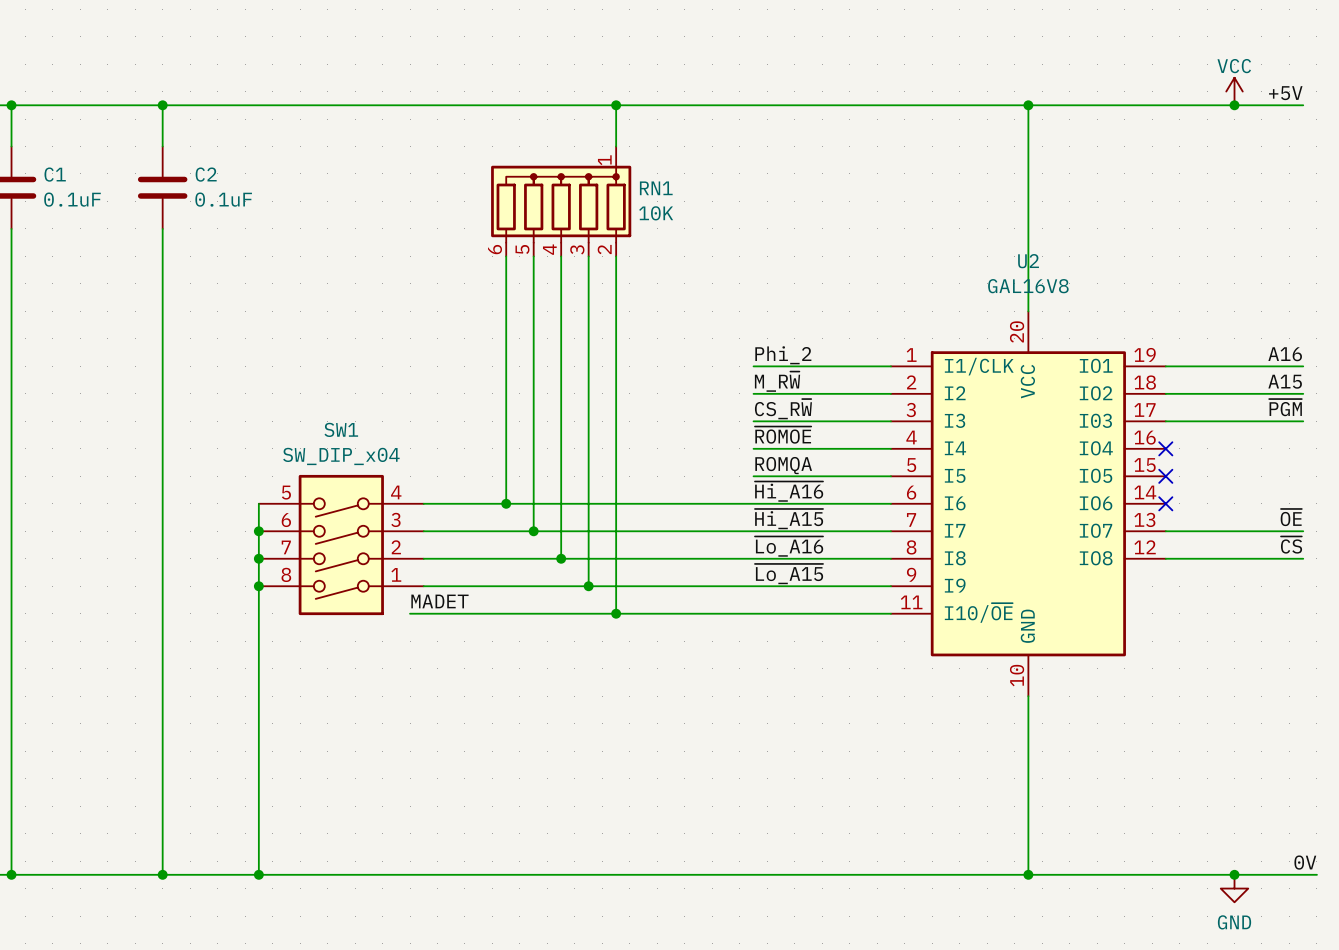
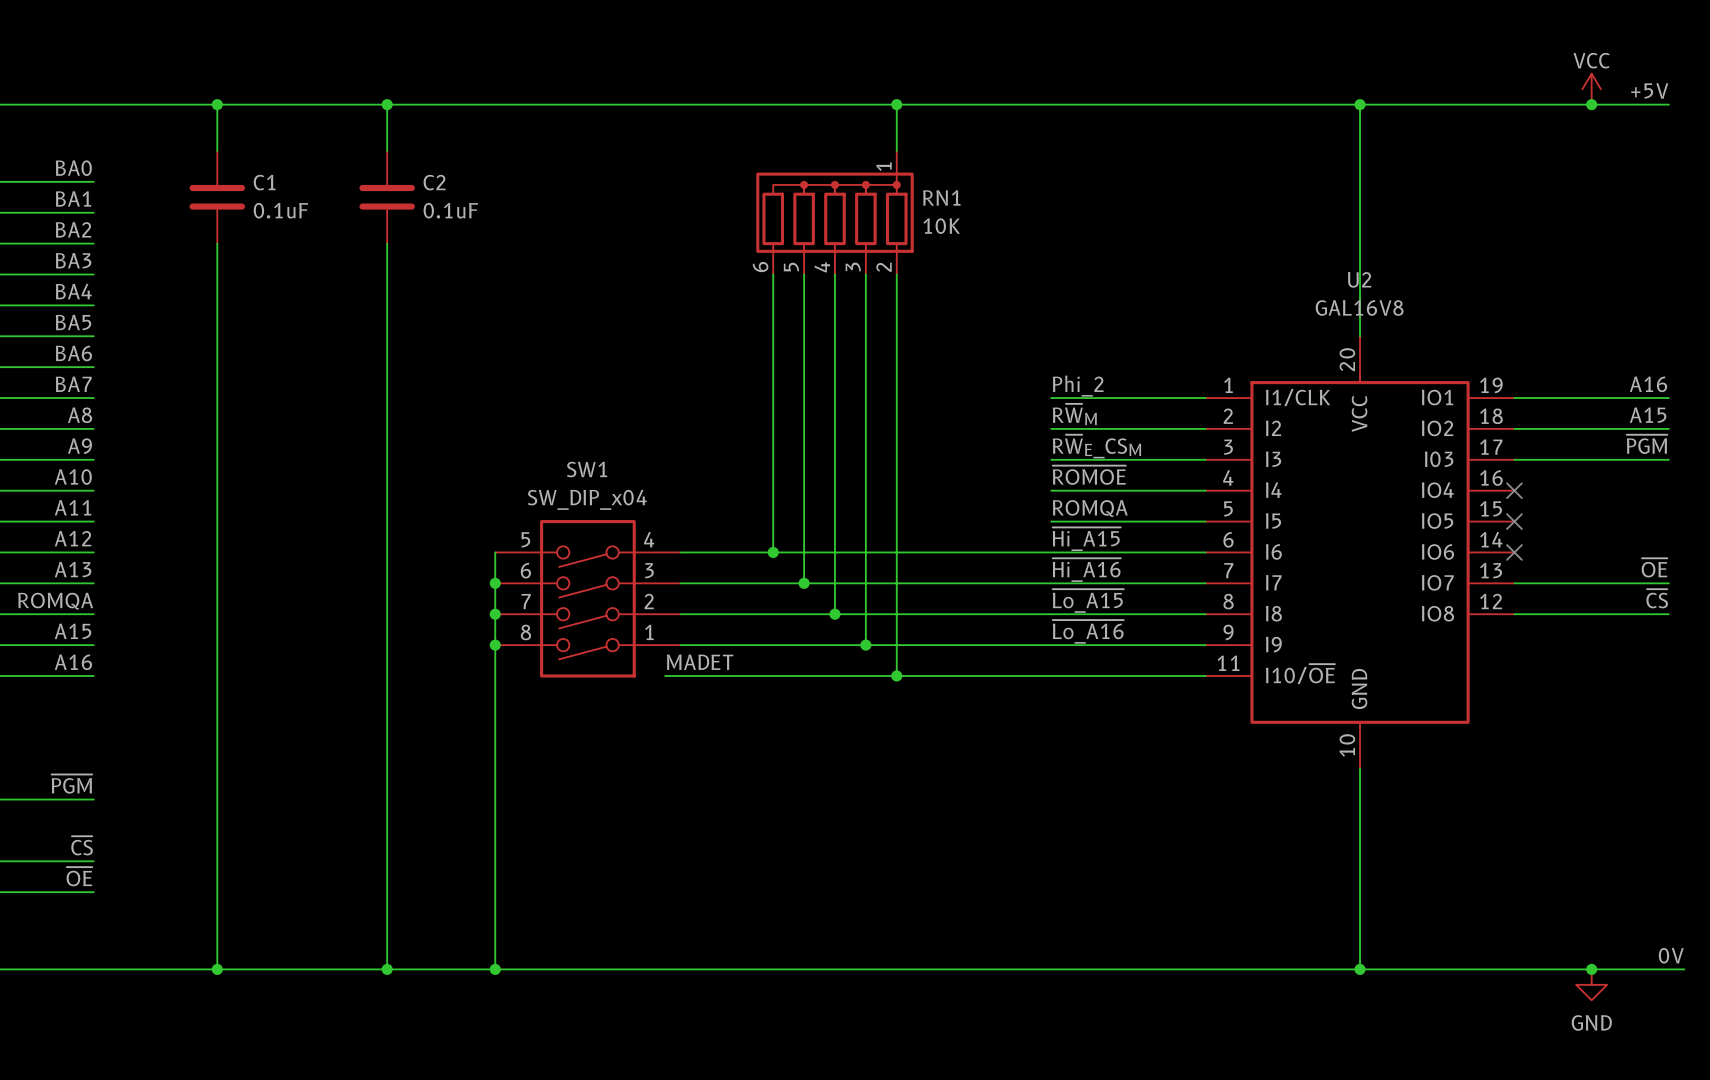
label: M_R~{W} (777, 381) -> R~{W}M (1074, 414)
label: CS_R~{W} (783, 409) -> R~{W}E_CSM (1096, 446)
label: ~{Hi_A16} (789, 491) -> ~{Hi_A15} (1086, 539)
label: ~{Hi_A15} (789, 519) -> ~{Hi_A16} (1086, 570)
label: ~{Lo_A16} (789, 546) -> ~{Lo_A15} (1088, 600)
label: ~{Lo_A15} (789, 574) -> ~{Lo_A16} (1088, 631)

